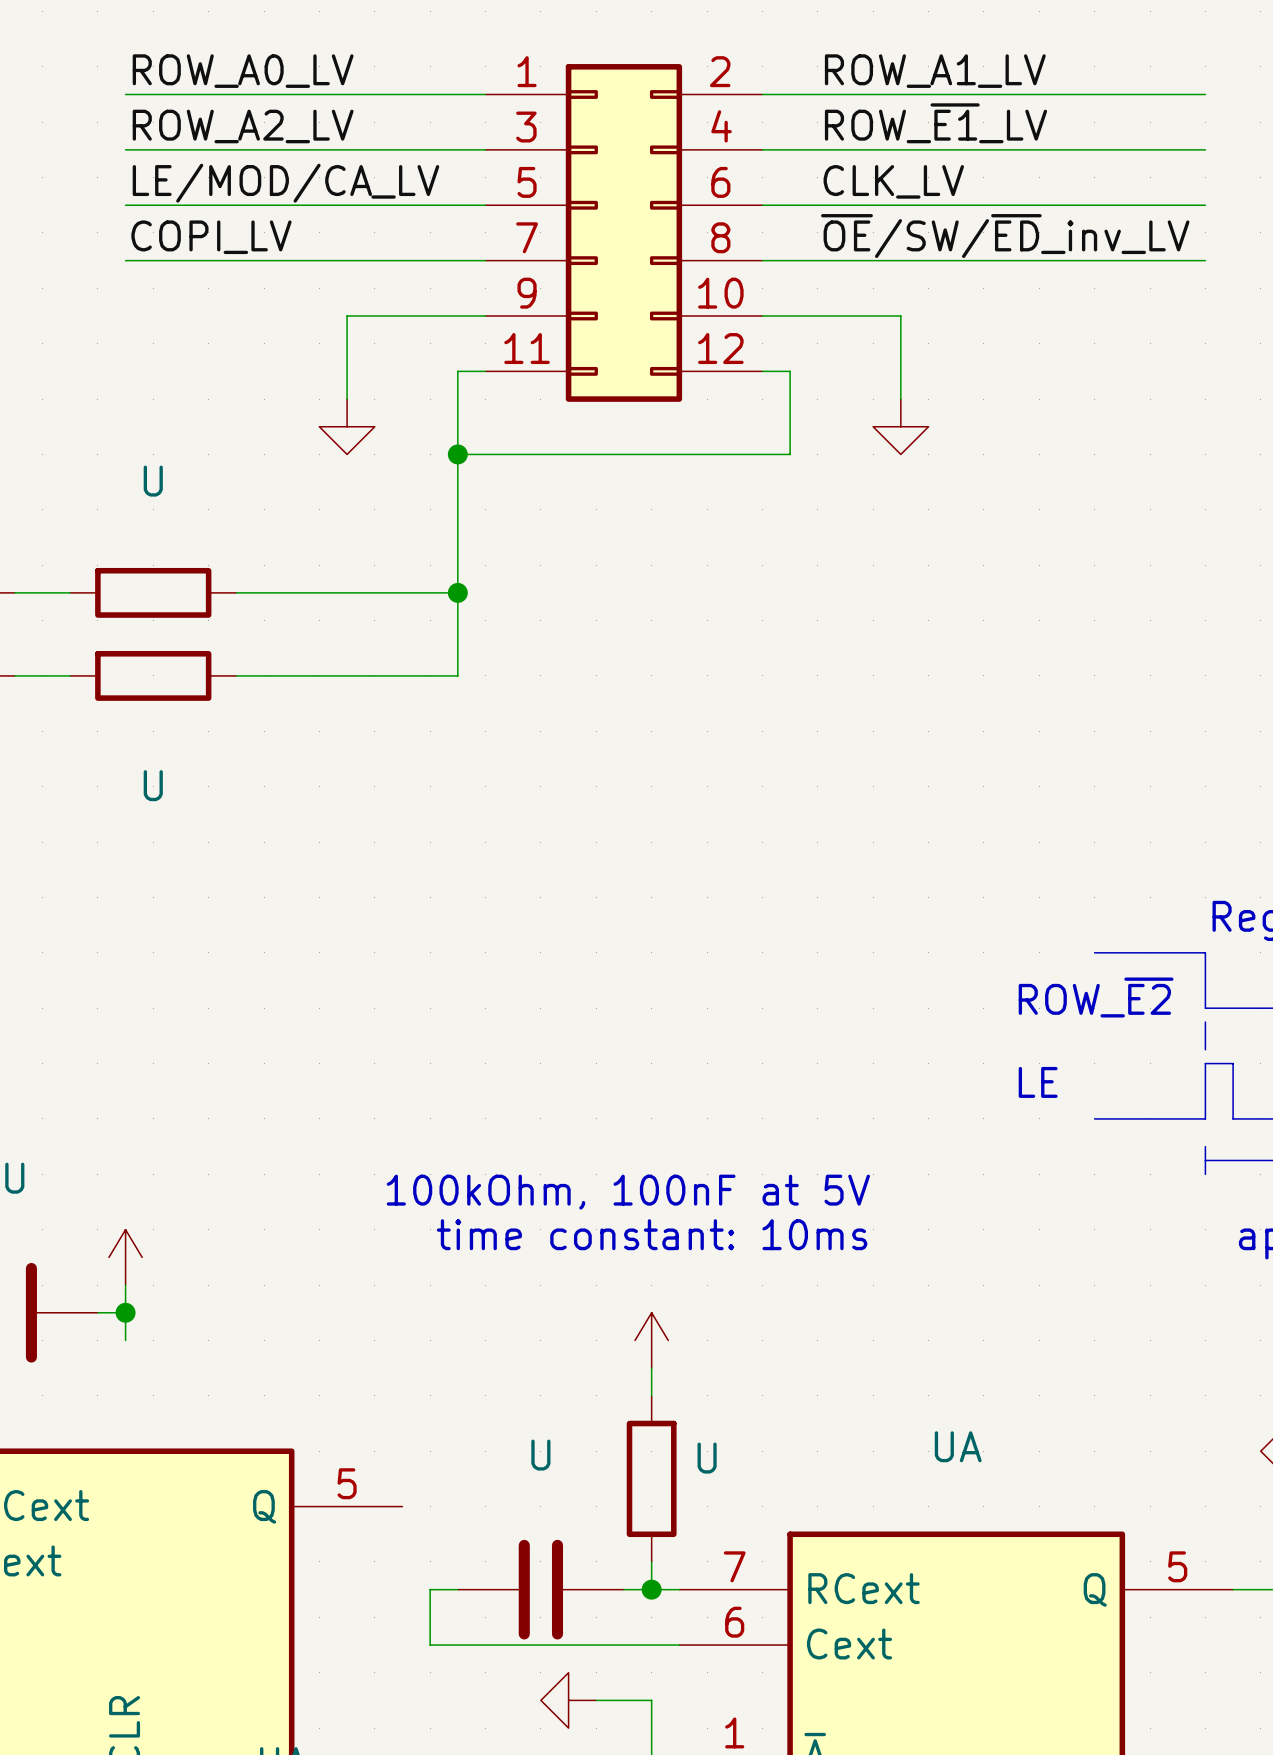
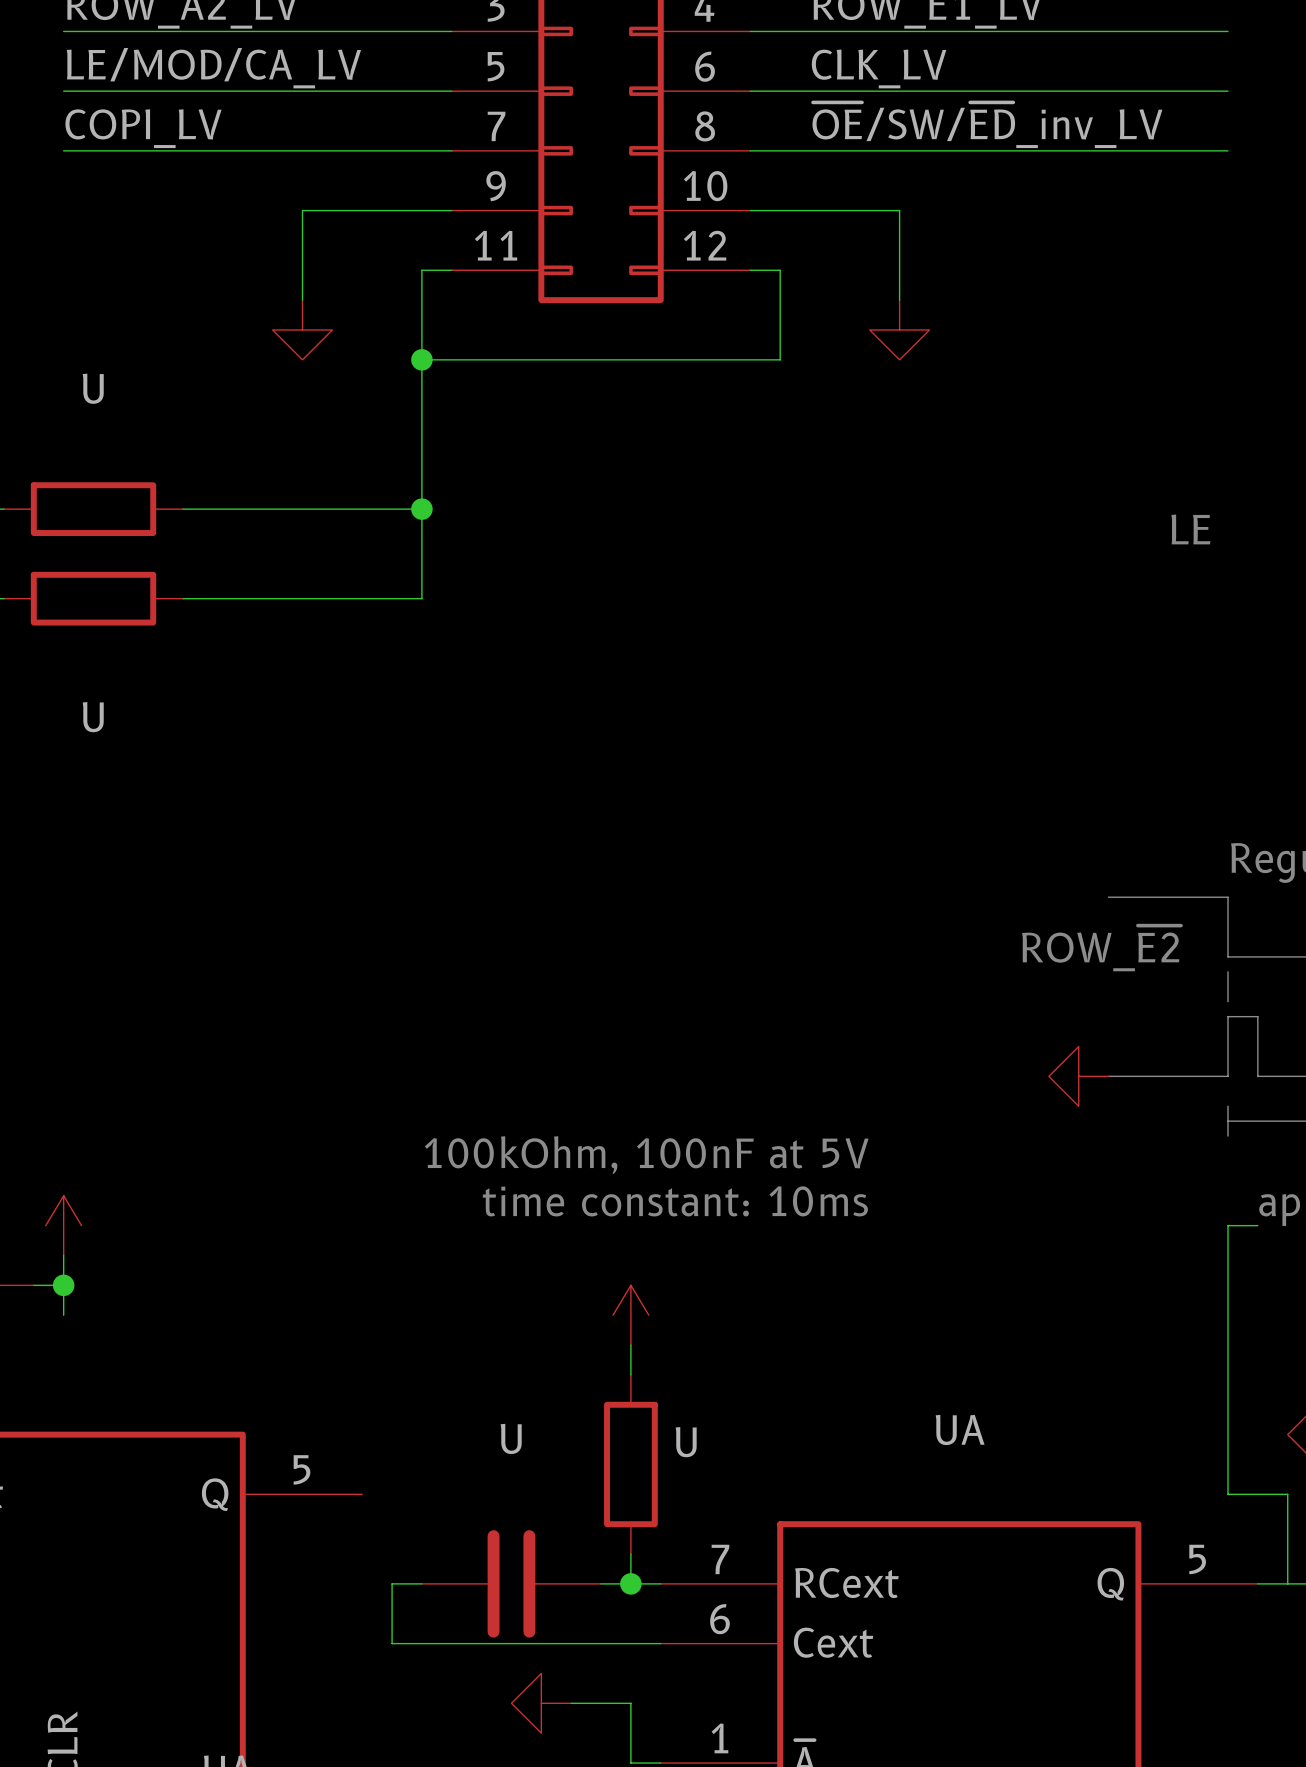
text position: LE (1038, 1082) -> LE (1190, 529)
power symbol: none -> (1078, 1076)
wire: none -> (1257, 1225) (1228, 1225) (1228, 1494) (1287, 1494) (1287, 1583)

